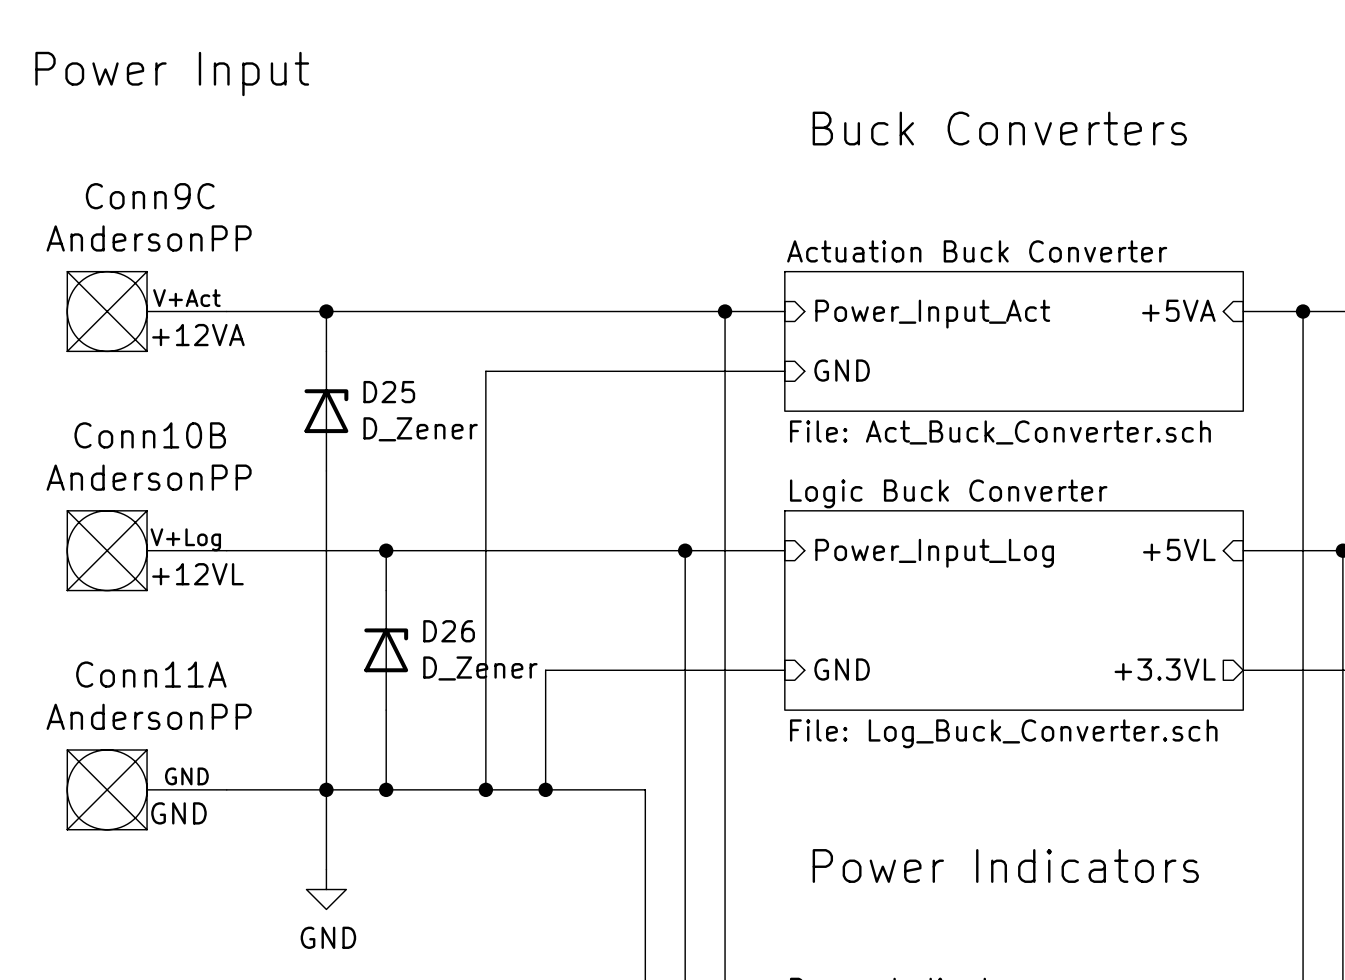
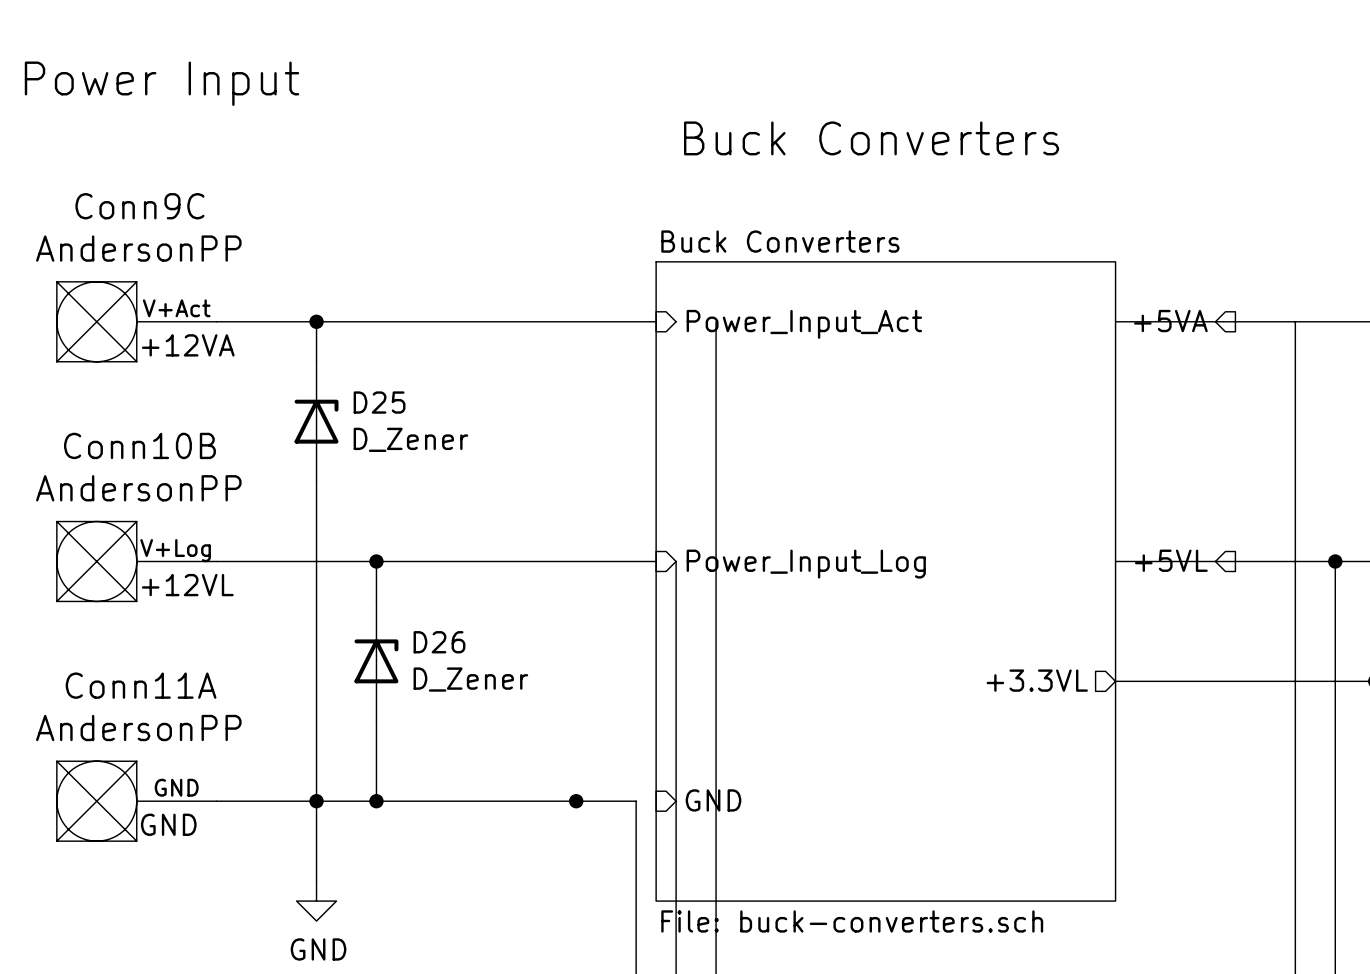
text position: Buck Converters (999, 128) -> Buck Converters (871, 138)
wire: (665, 311) (784, 311) -> none
junction: (725, 311) -> none
wire: none -> (1115, 321) (1235, 321)
junction: (1303, 311) -> none
sheet pin position: Power_Input_Act (932, 314) -> Power_Input_Act (804, 324)
sheet Actuation Buck Converter: File: Act_Buck_Converter.sch (1014, 341) -> none
sheet pin: GND (842, 370) -> none
wire: (784, 371) (485, 371) (485, 789) -> none
wire: (665, 550) (784, 550) -> none
junction: (685, 550) -> none
wire: none -> (1115, 561) (1235, 561)
sheet pin position: Power_Input_Log (934, 553) -> Power_Input_Log (806, 564)
sheet Buck Converters: none -> File: buck-converters.sch (885, 581)
sheet Logic Buck Converter: File: Log_Buck_Converter.sch (1014, 610) -> none
sheet pin position: GND (842, 669) -> GND (713, 800)
sheet pin position: +3.3VL (1165, 669) -> +3.3VL (1037, 680)
wire: (784, 670) (545, 670) (545, 789) -> none
wire: none -> (1115, 681) (1235, 681)
junction: (485, 789) -> none
junction position: (545, 789) -> (576, 801)
text: Power Indicators (1005, 865) -> none

